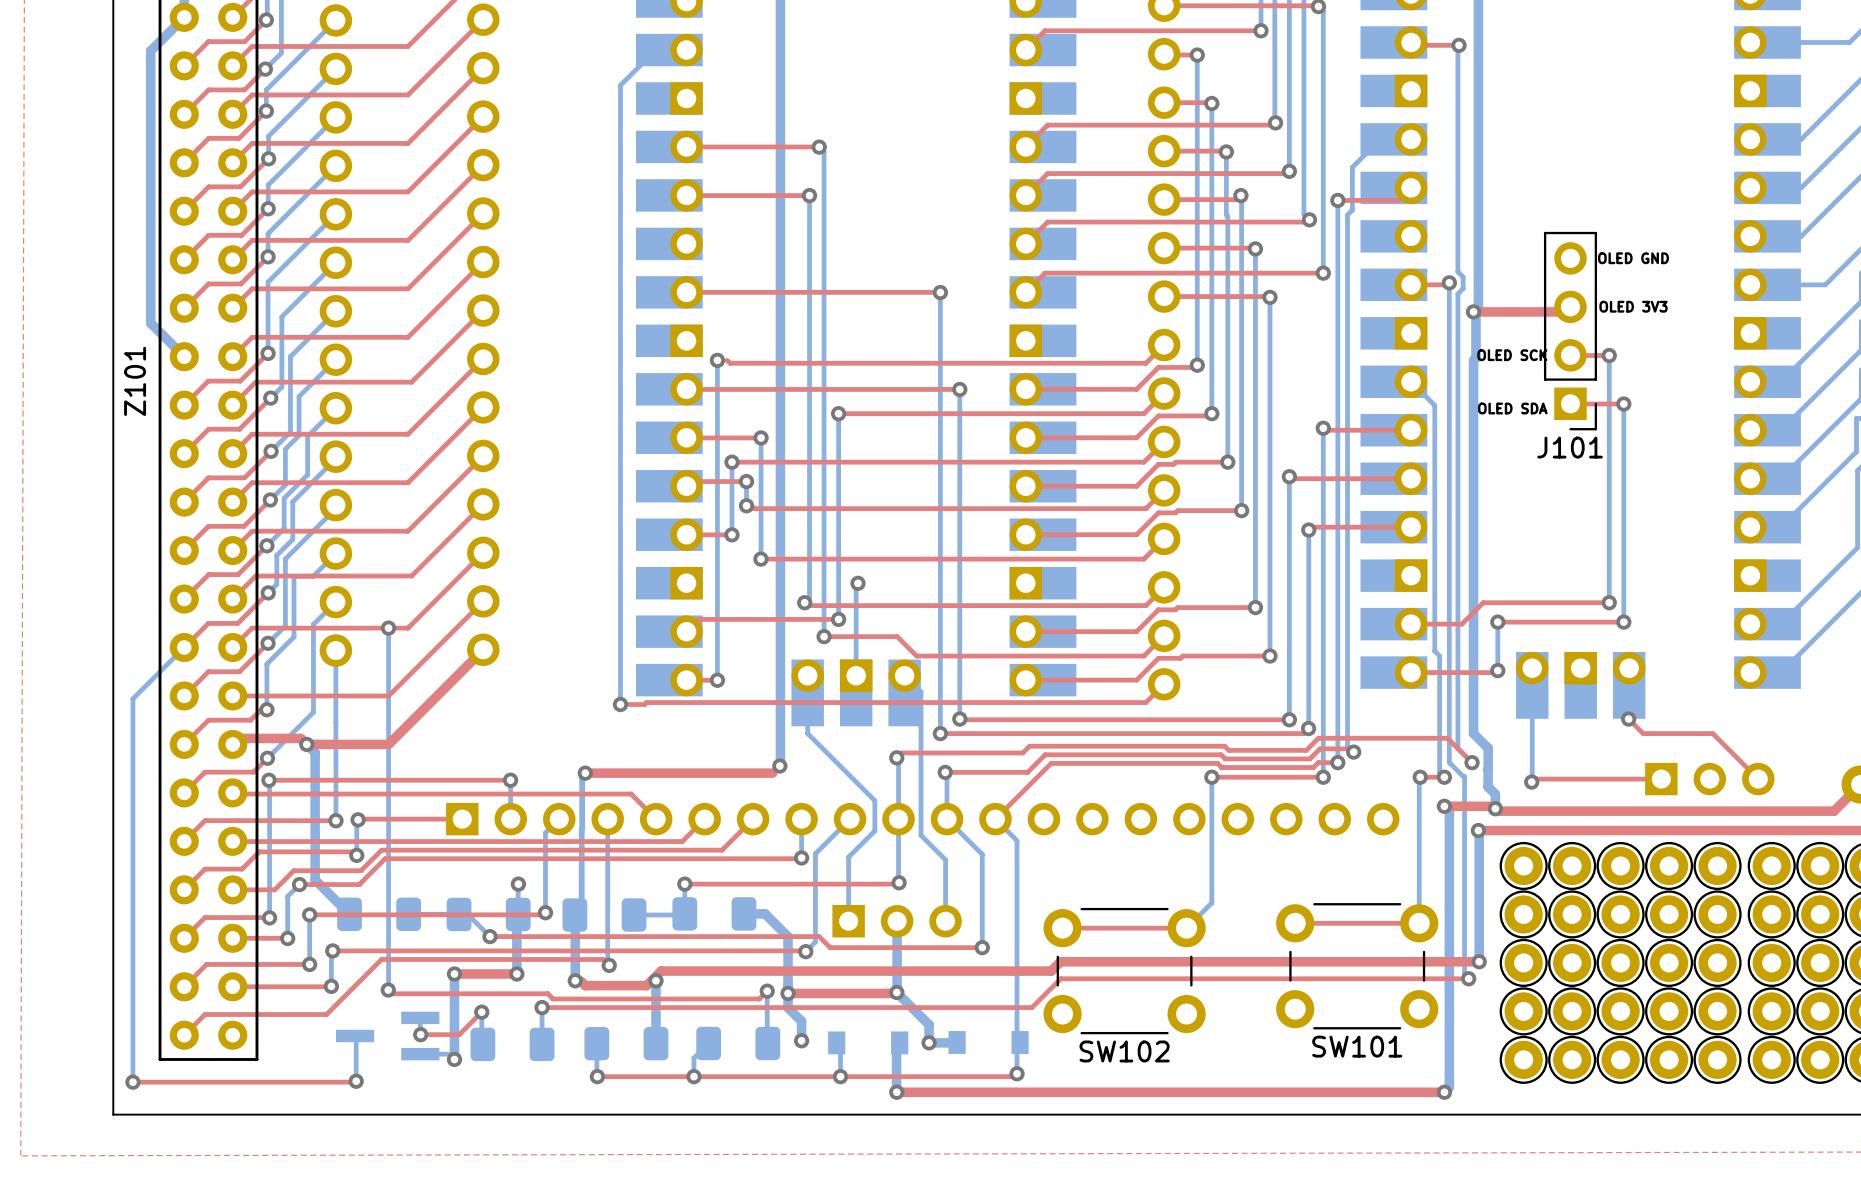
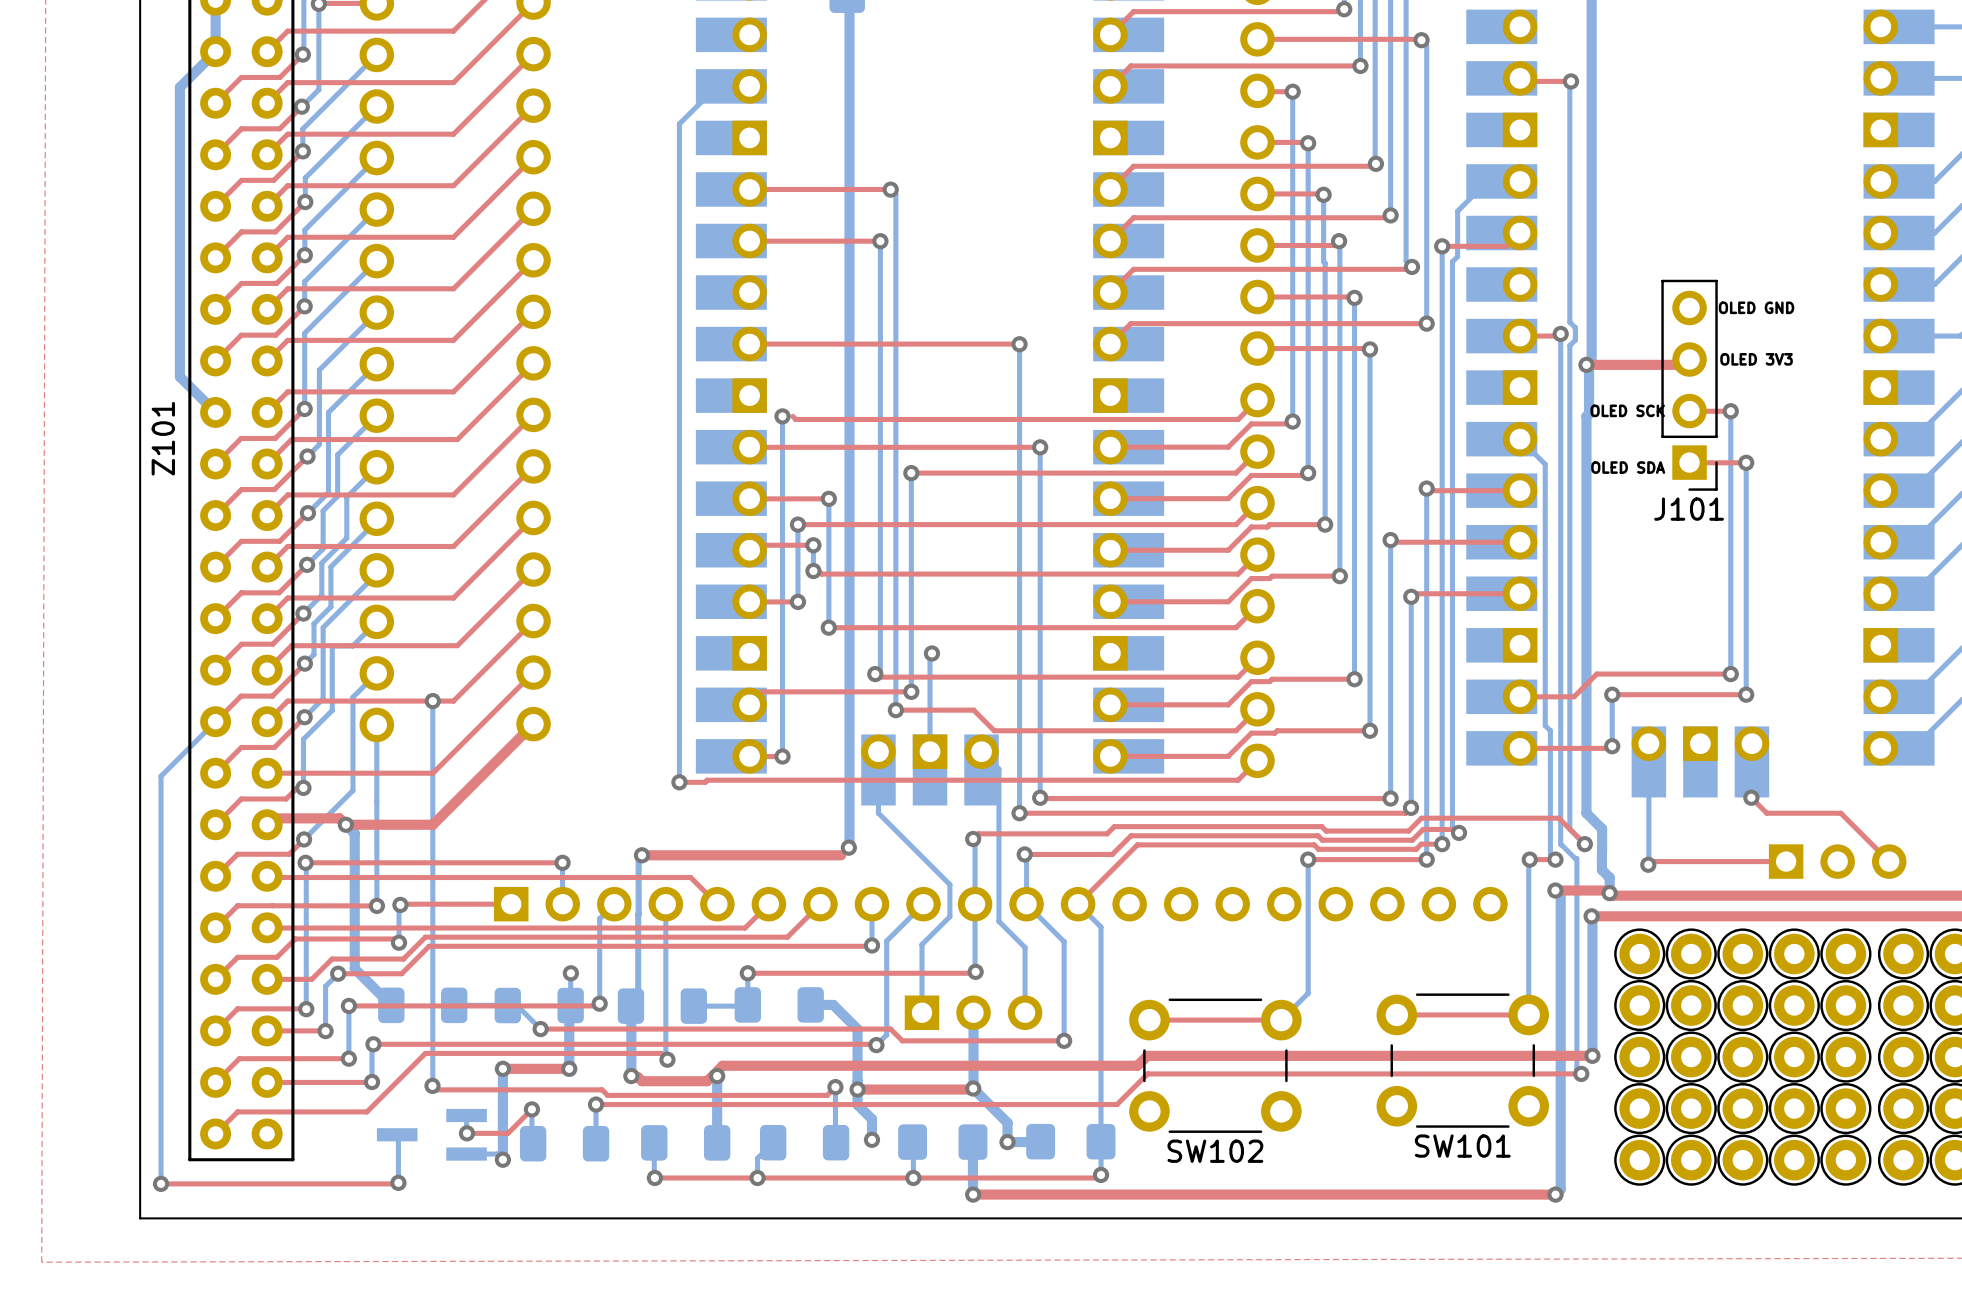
part footprint: [828, 1031, 909, 1055] -> [898, 1124, 988, 1160]
part footprint: [948, 1031, 1029, 1054] -> [1026, 1123, 1116, 1160]

